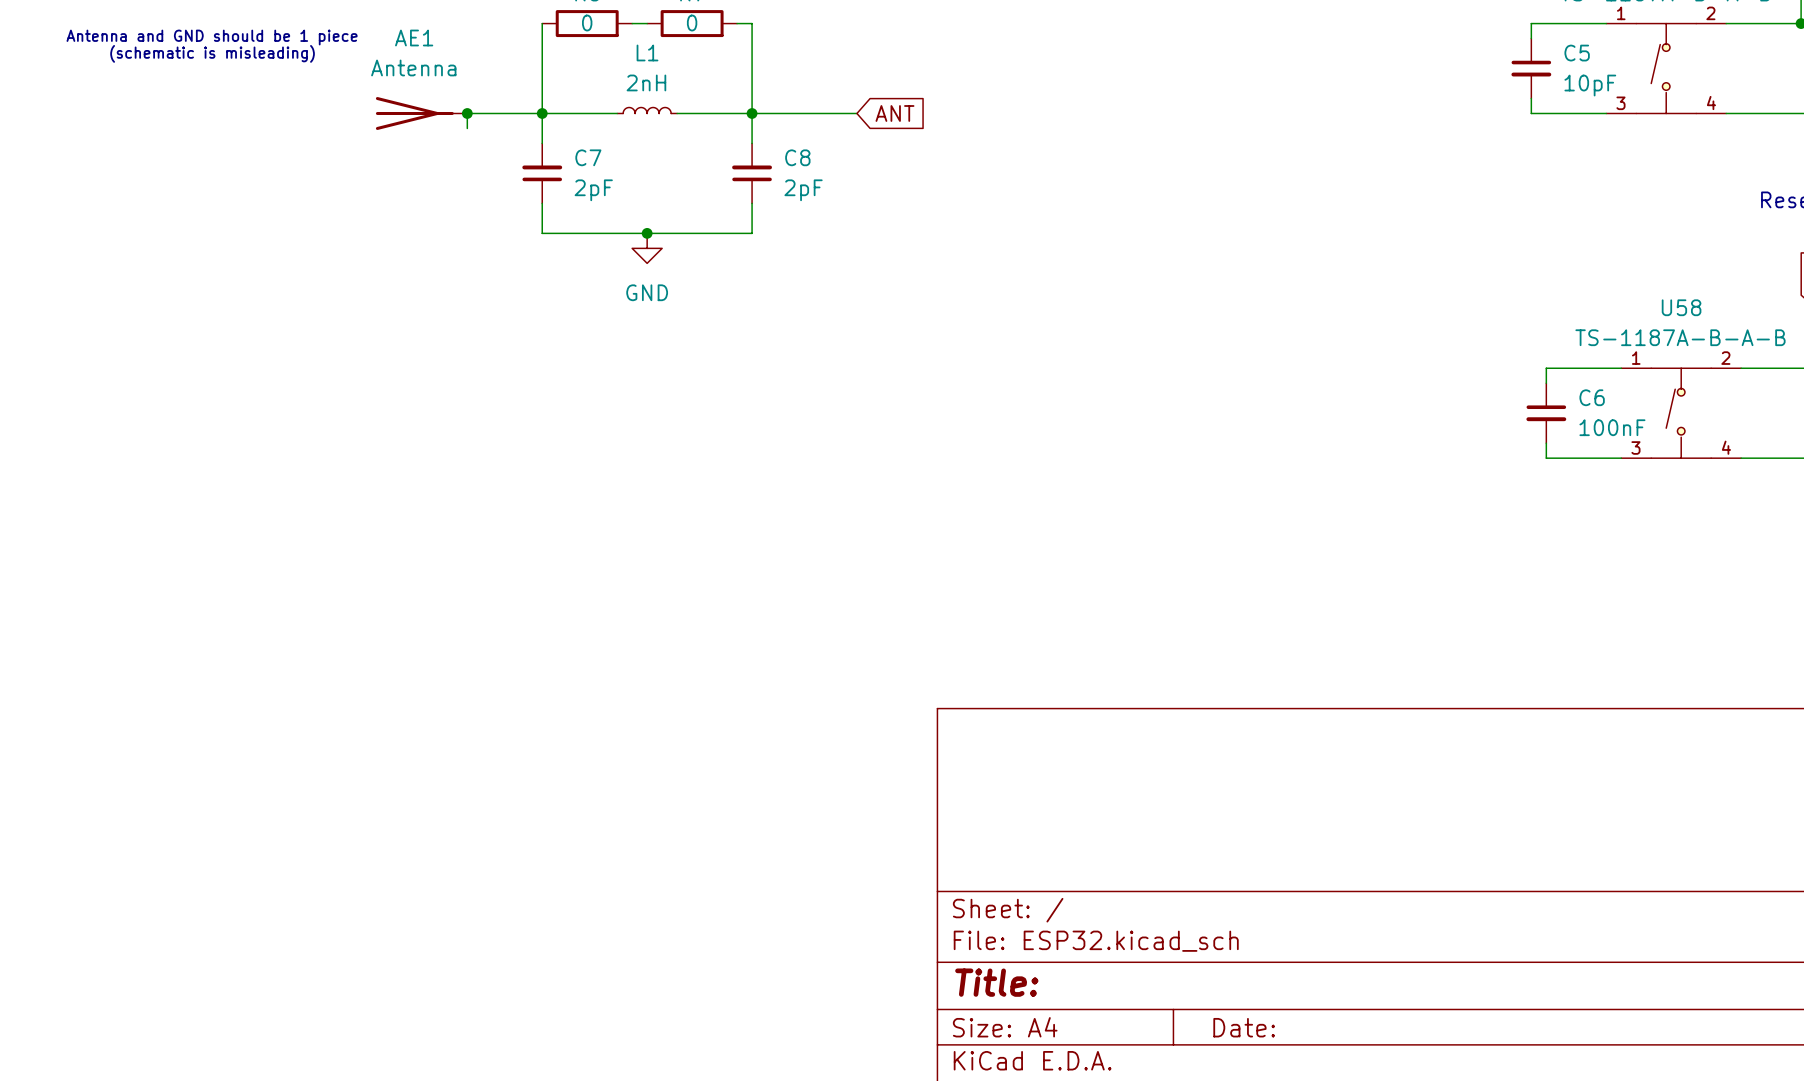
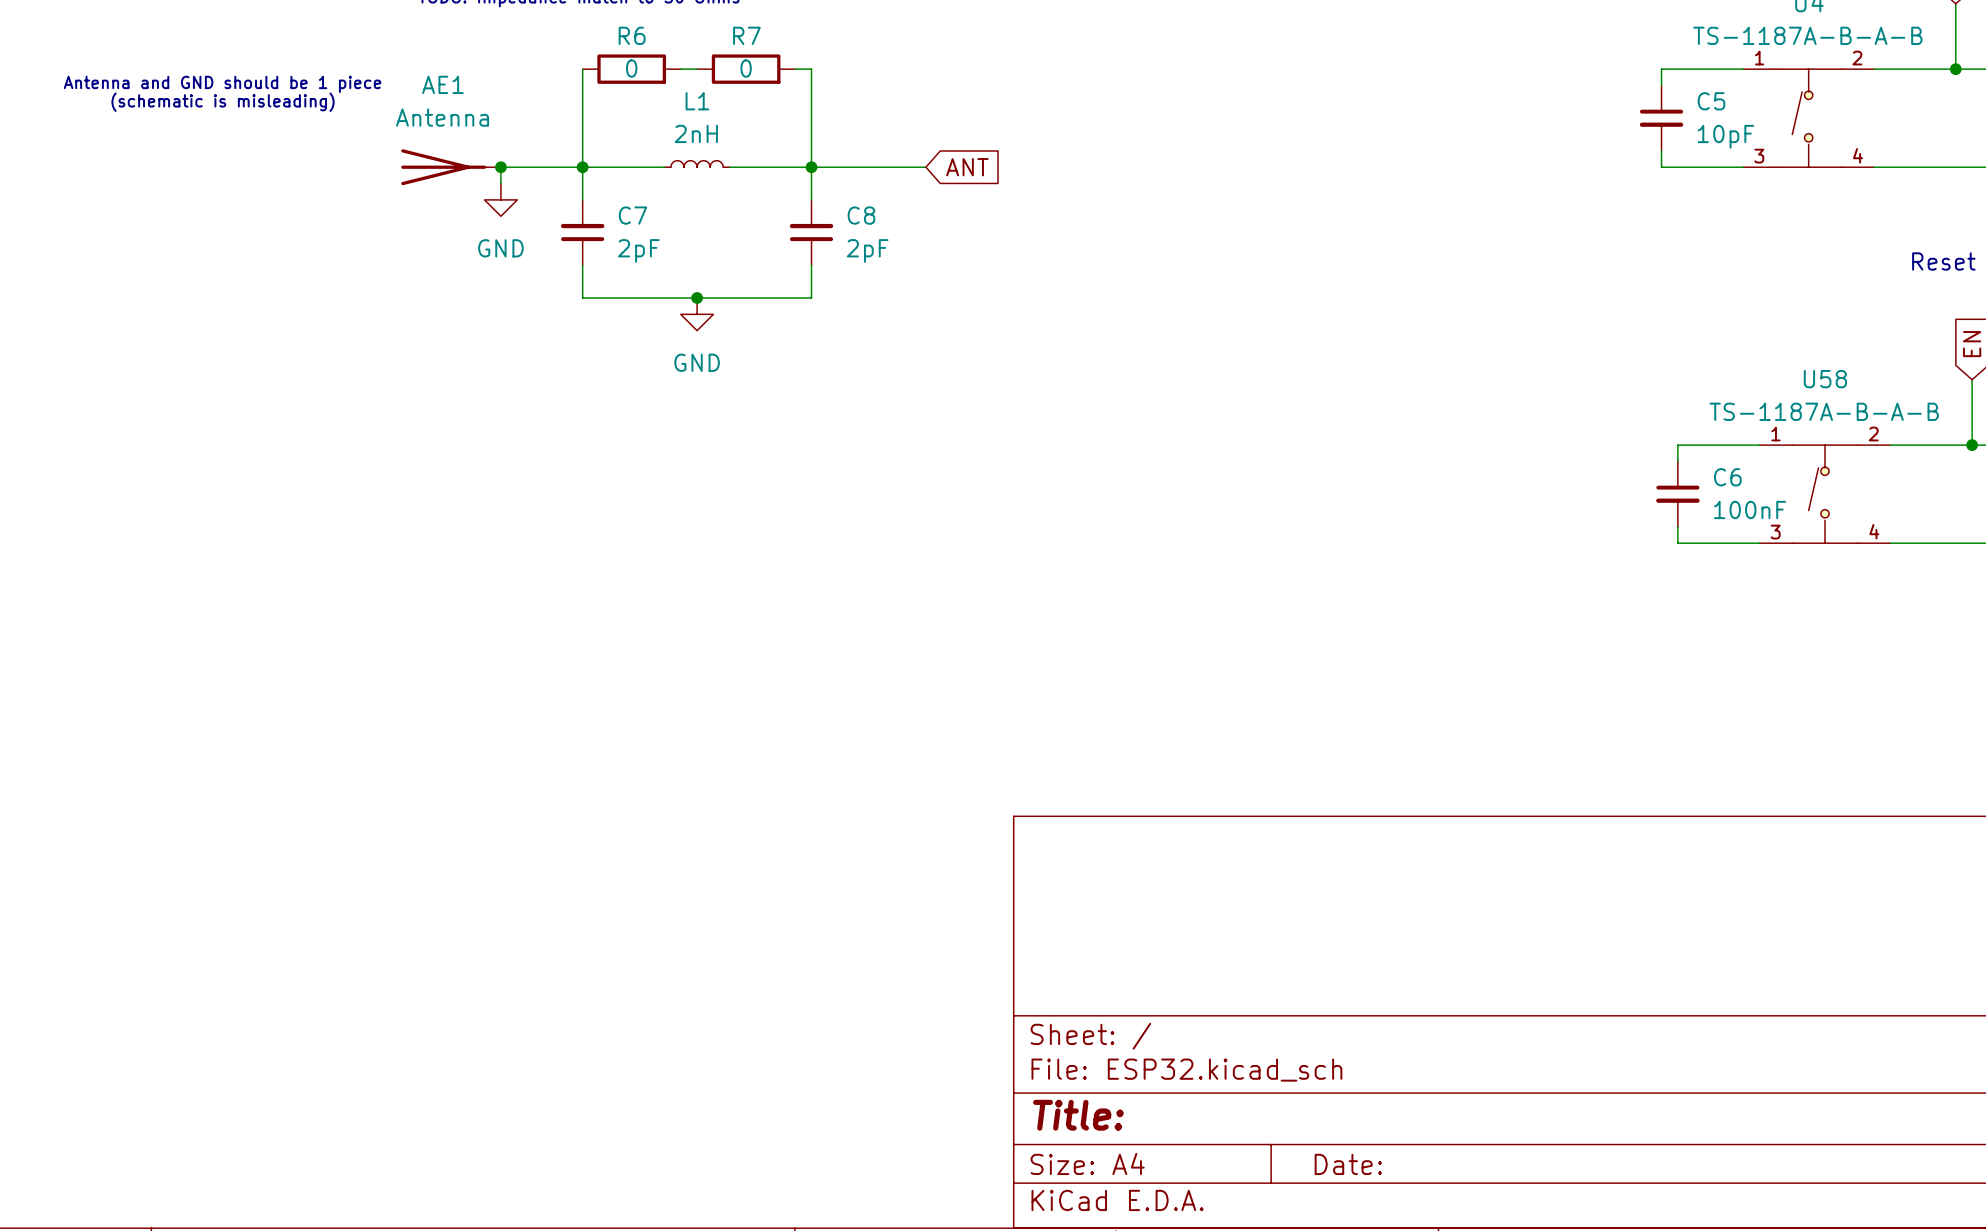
power symbol: none -> GND (500, 199)

